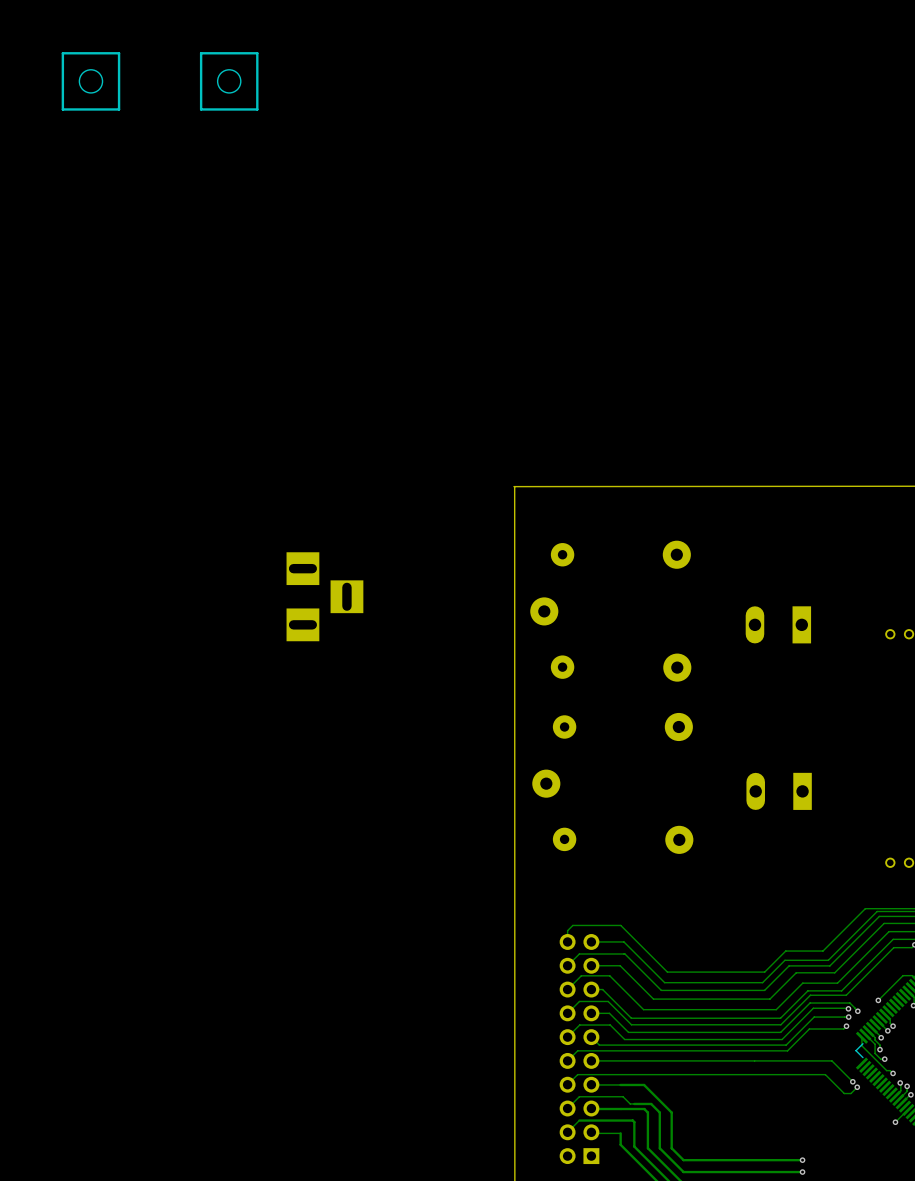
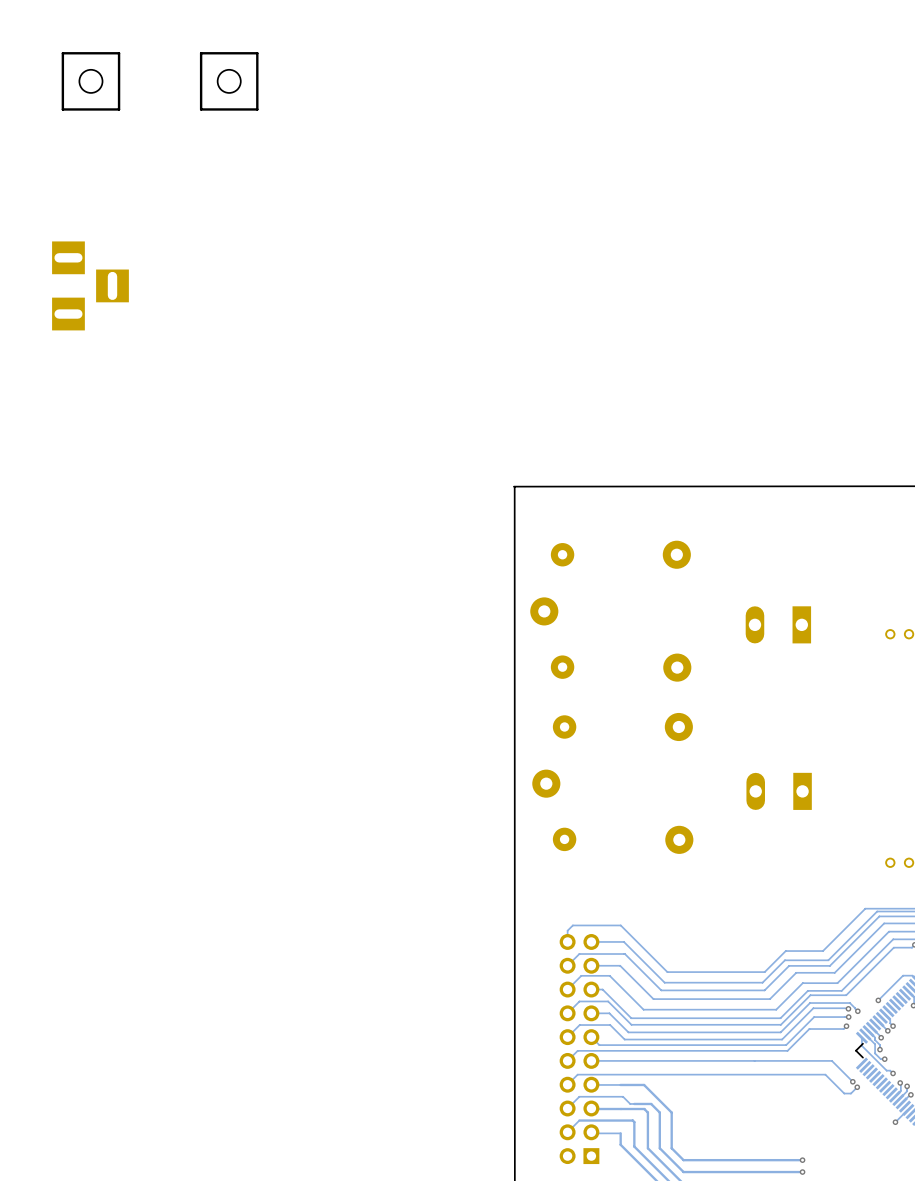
part: none -> (90, 285)
part: (324, 596) -> none

